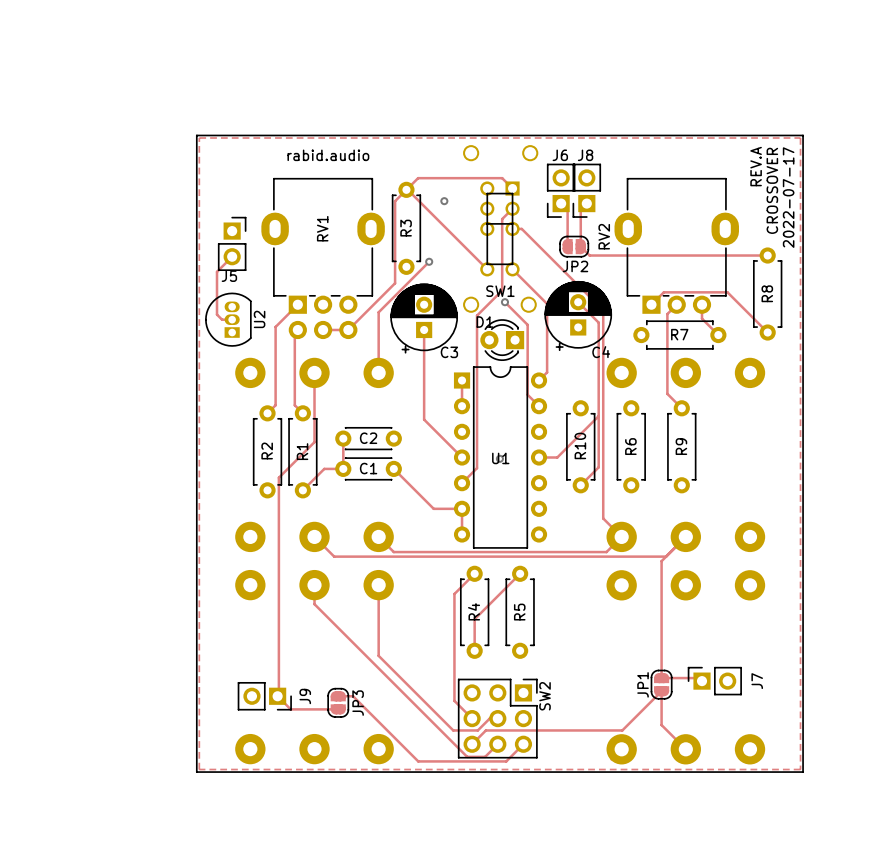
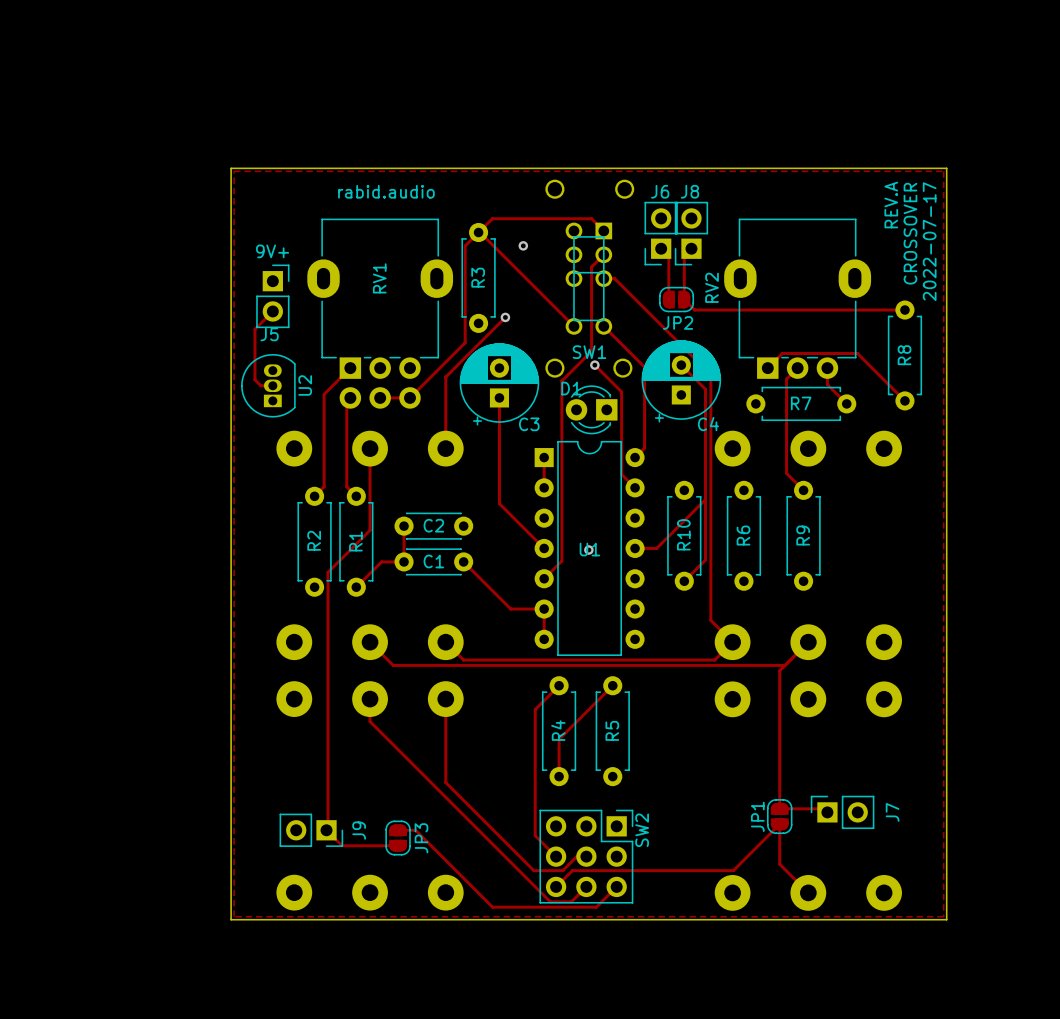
text: none -> 9V+ (272, 251)

